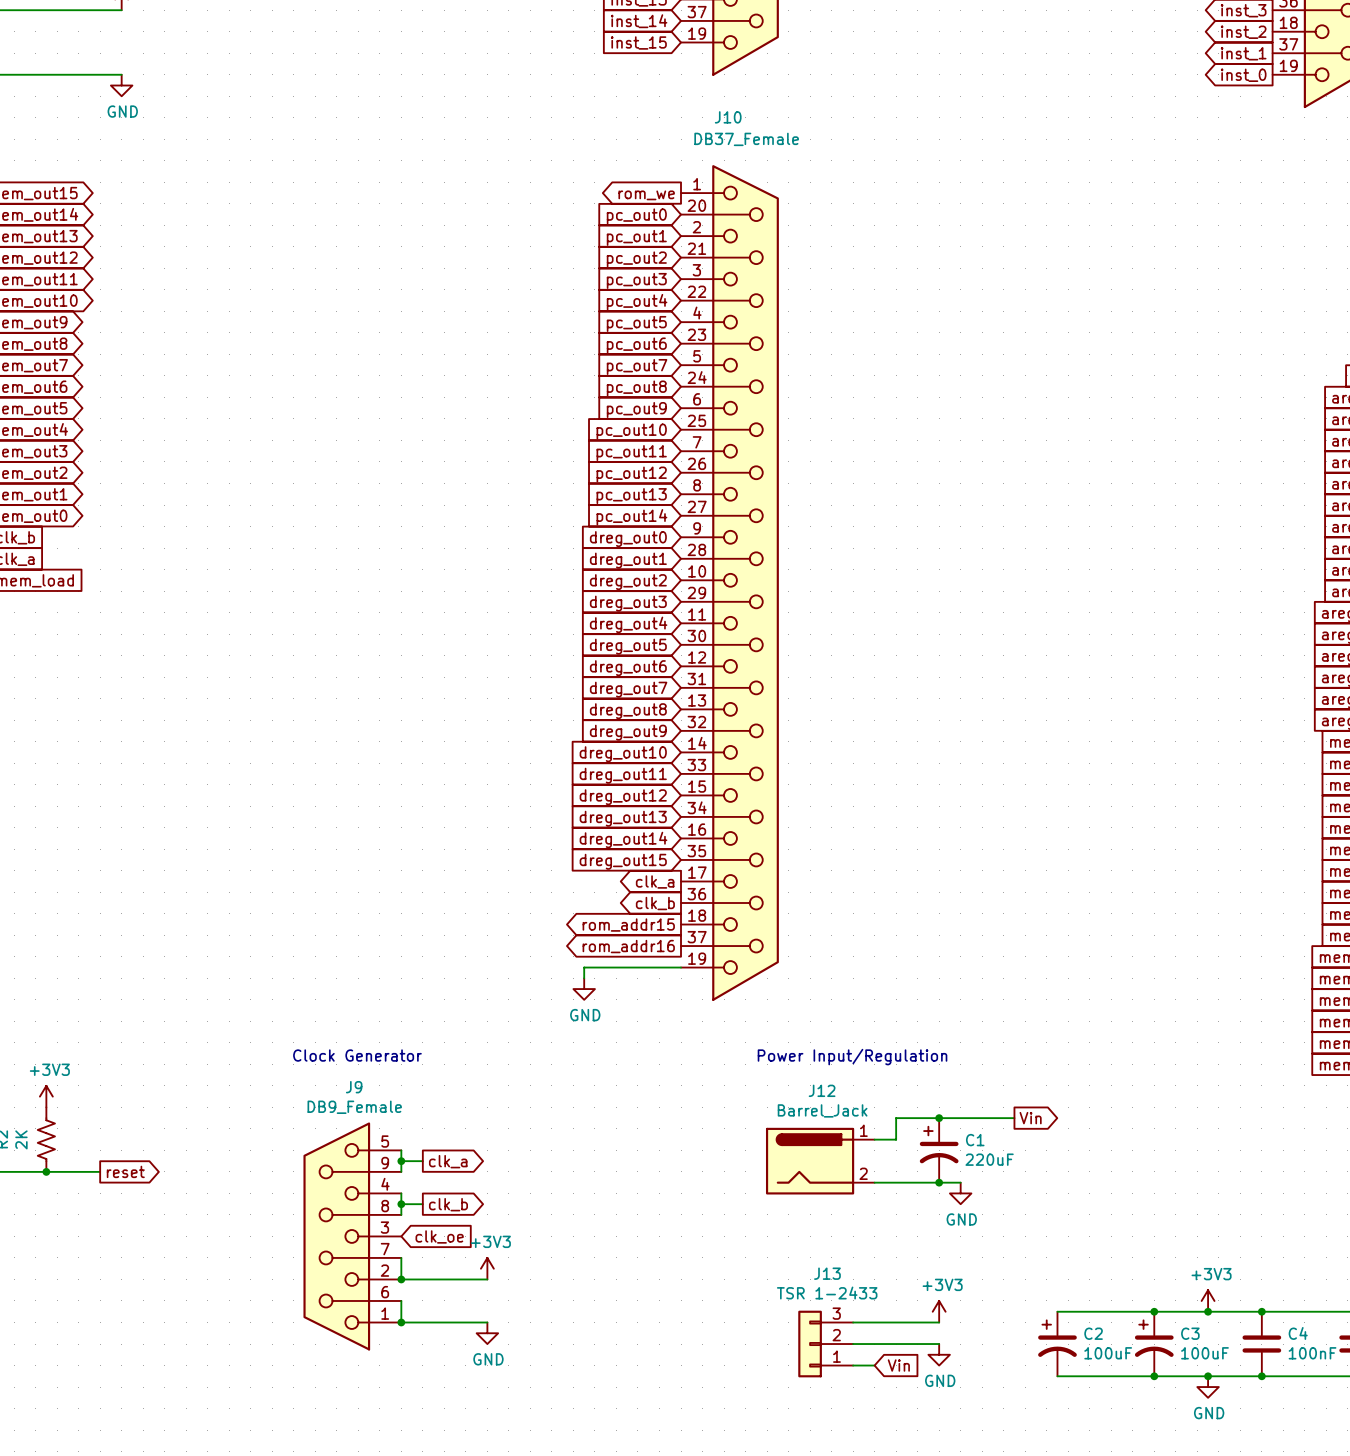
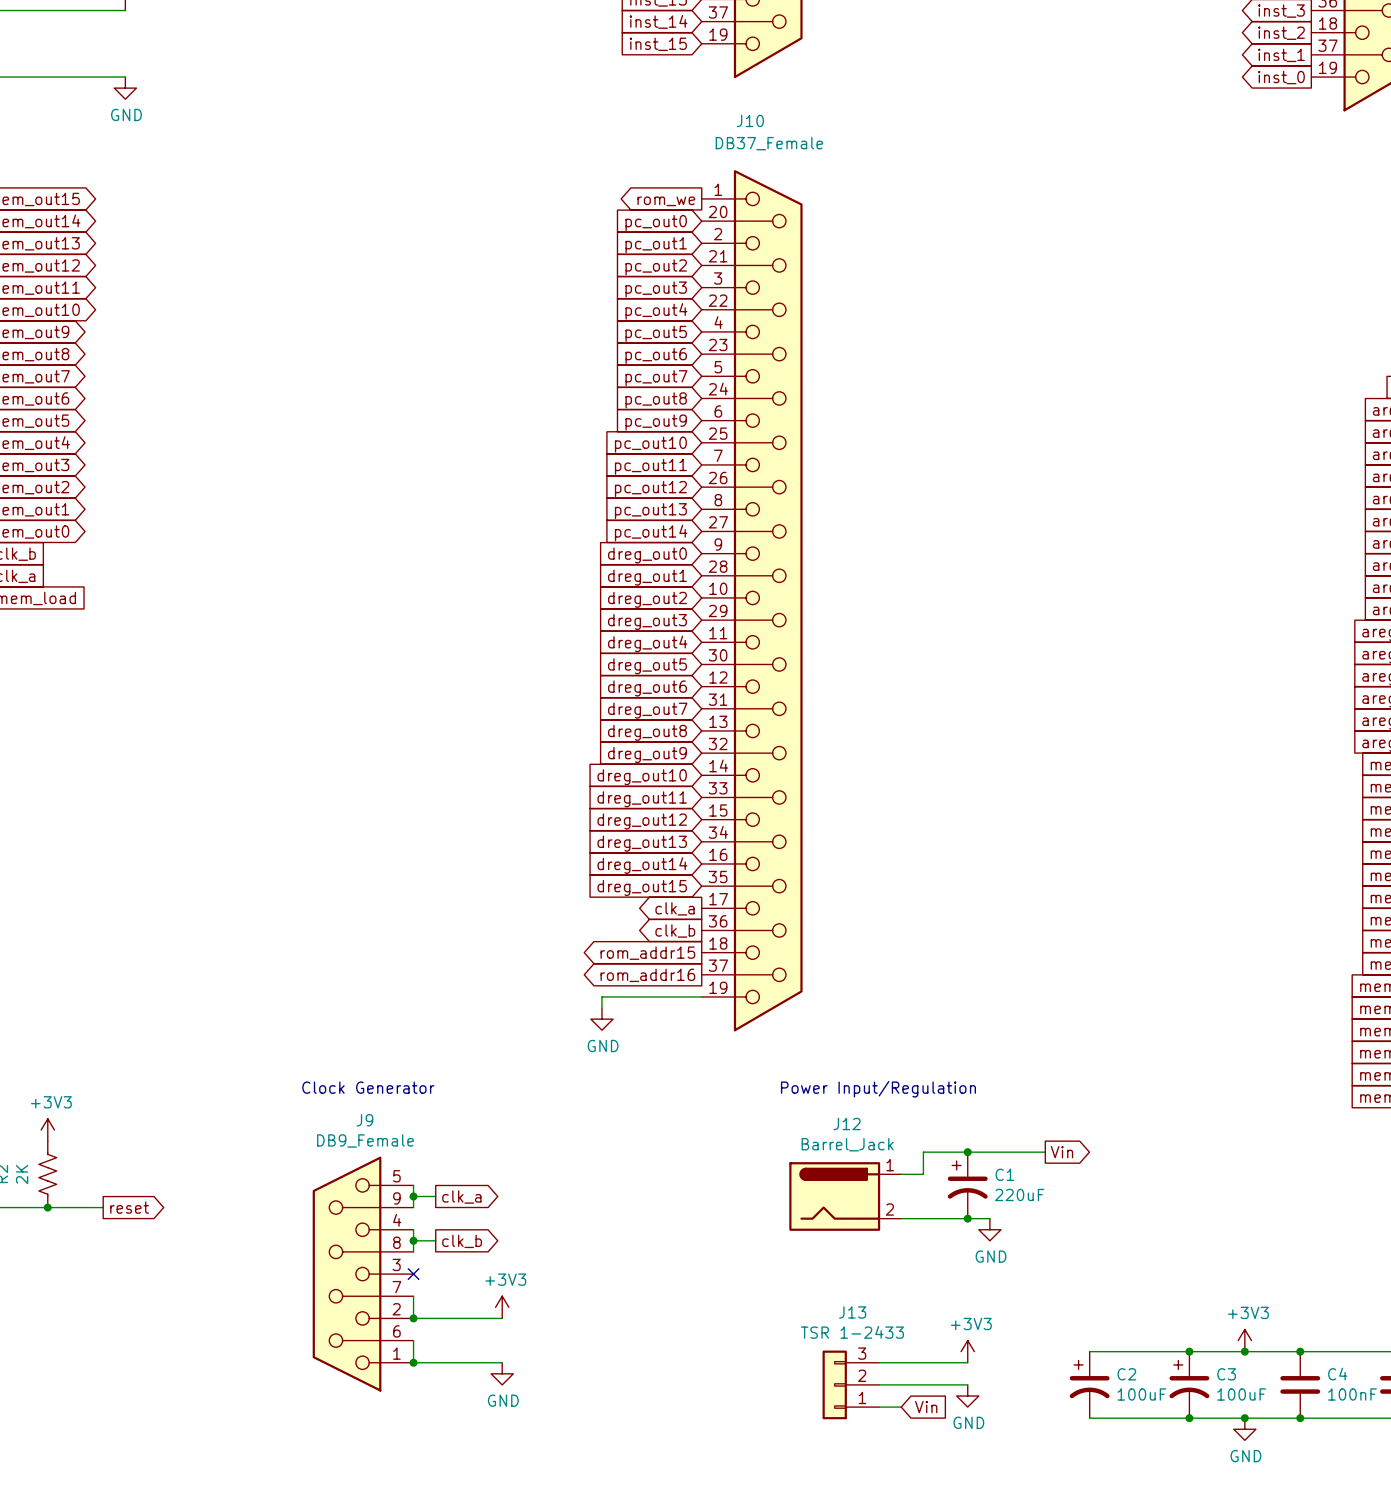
no-connect mark: none -> (413, 1274)
global label: clk_oe (439, 1236) -> none

